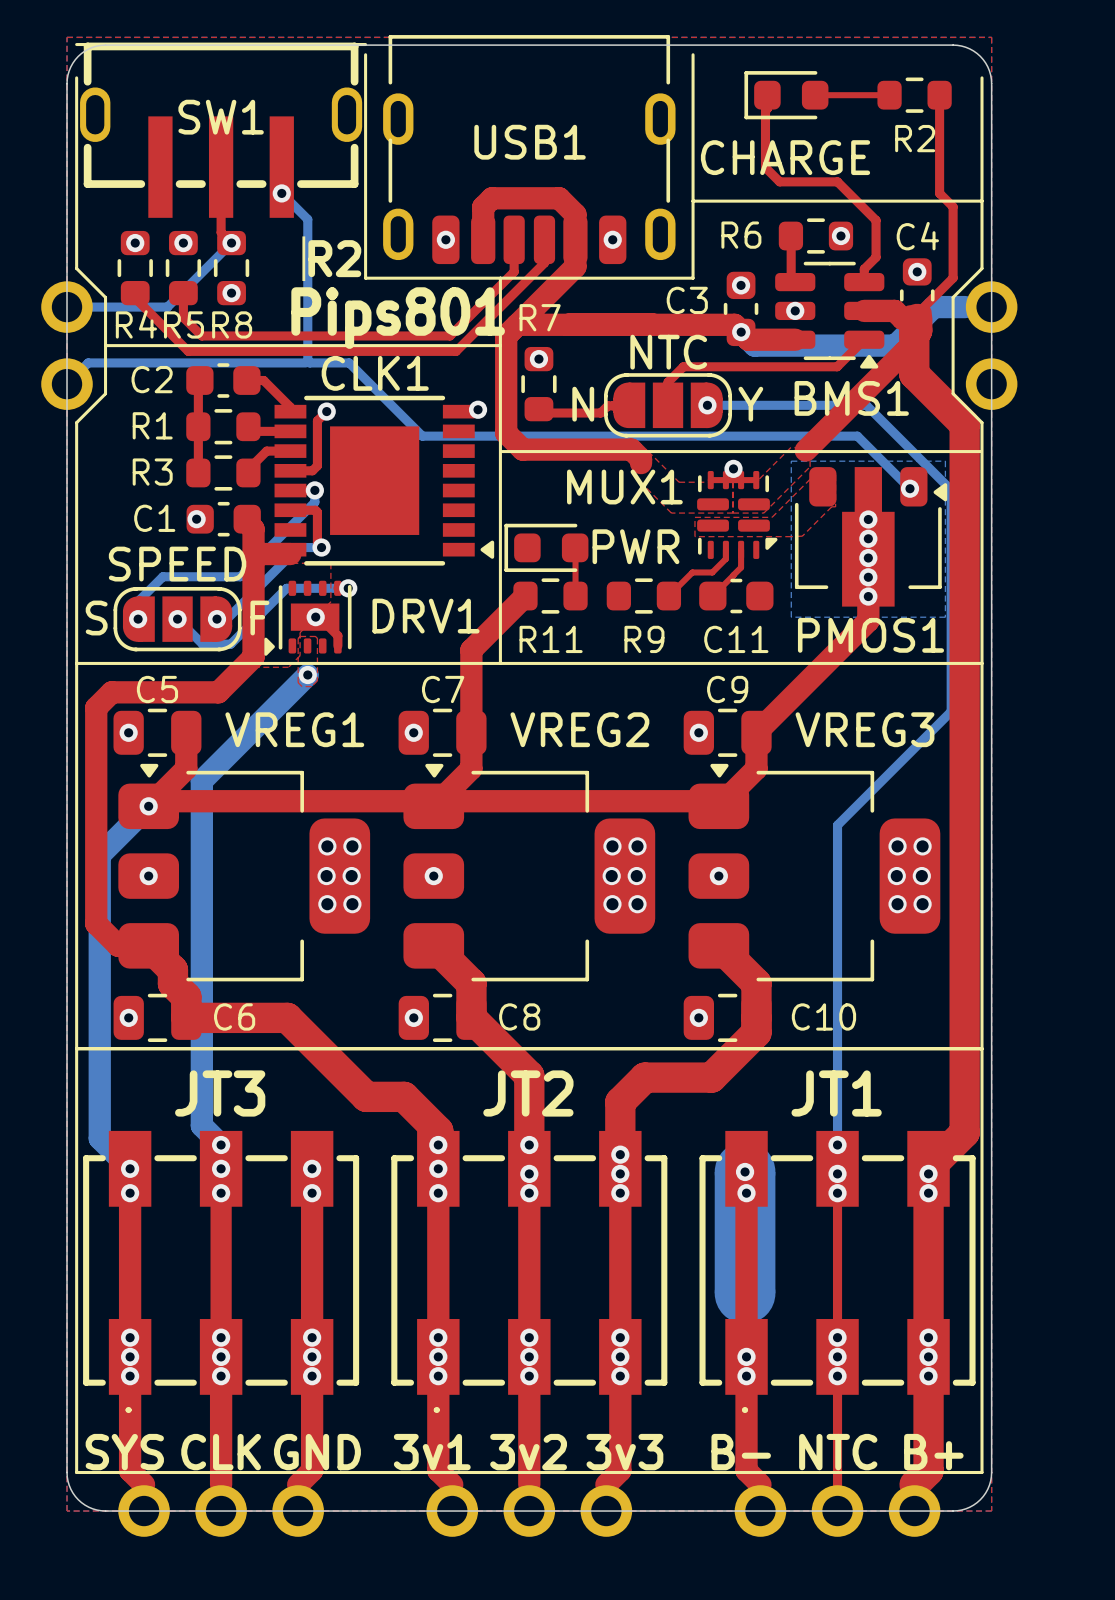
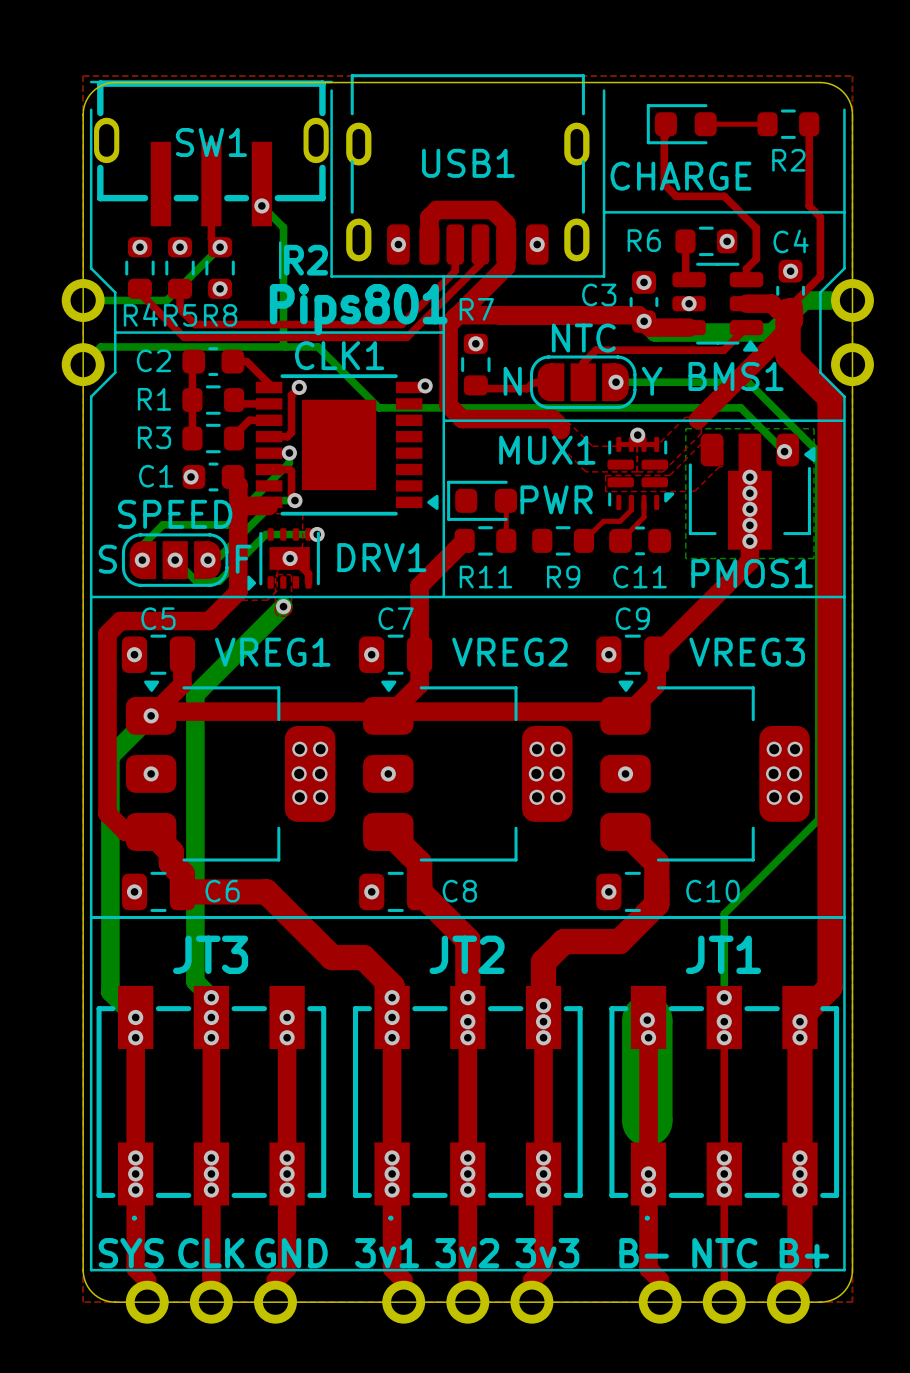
bottom track: (951, 711) (837, 825) (837, 1044) -> (818, 637) (818, 819) (724, 913)

